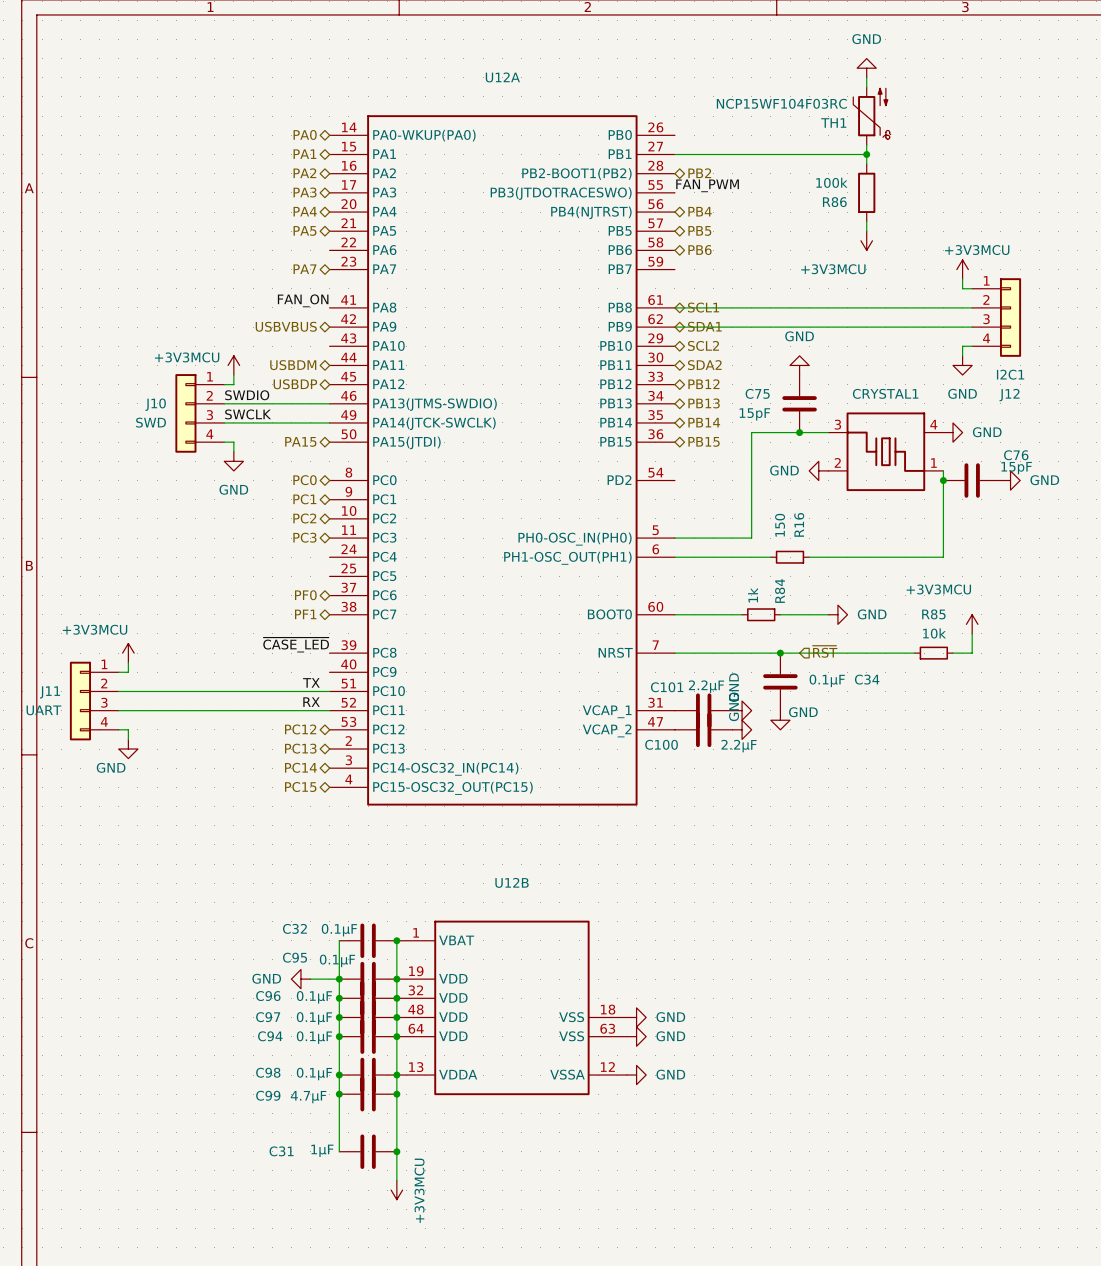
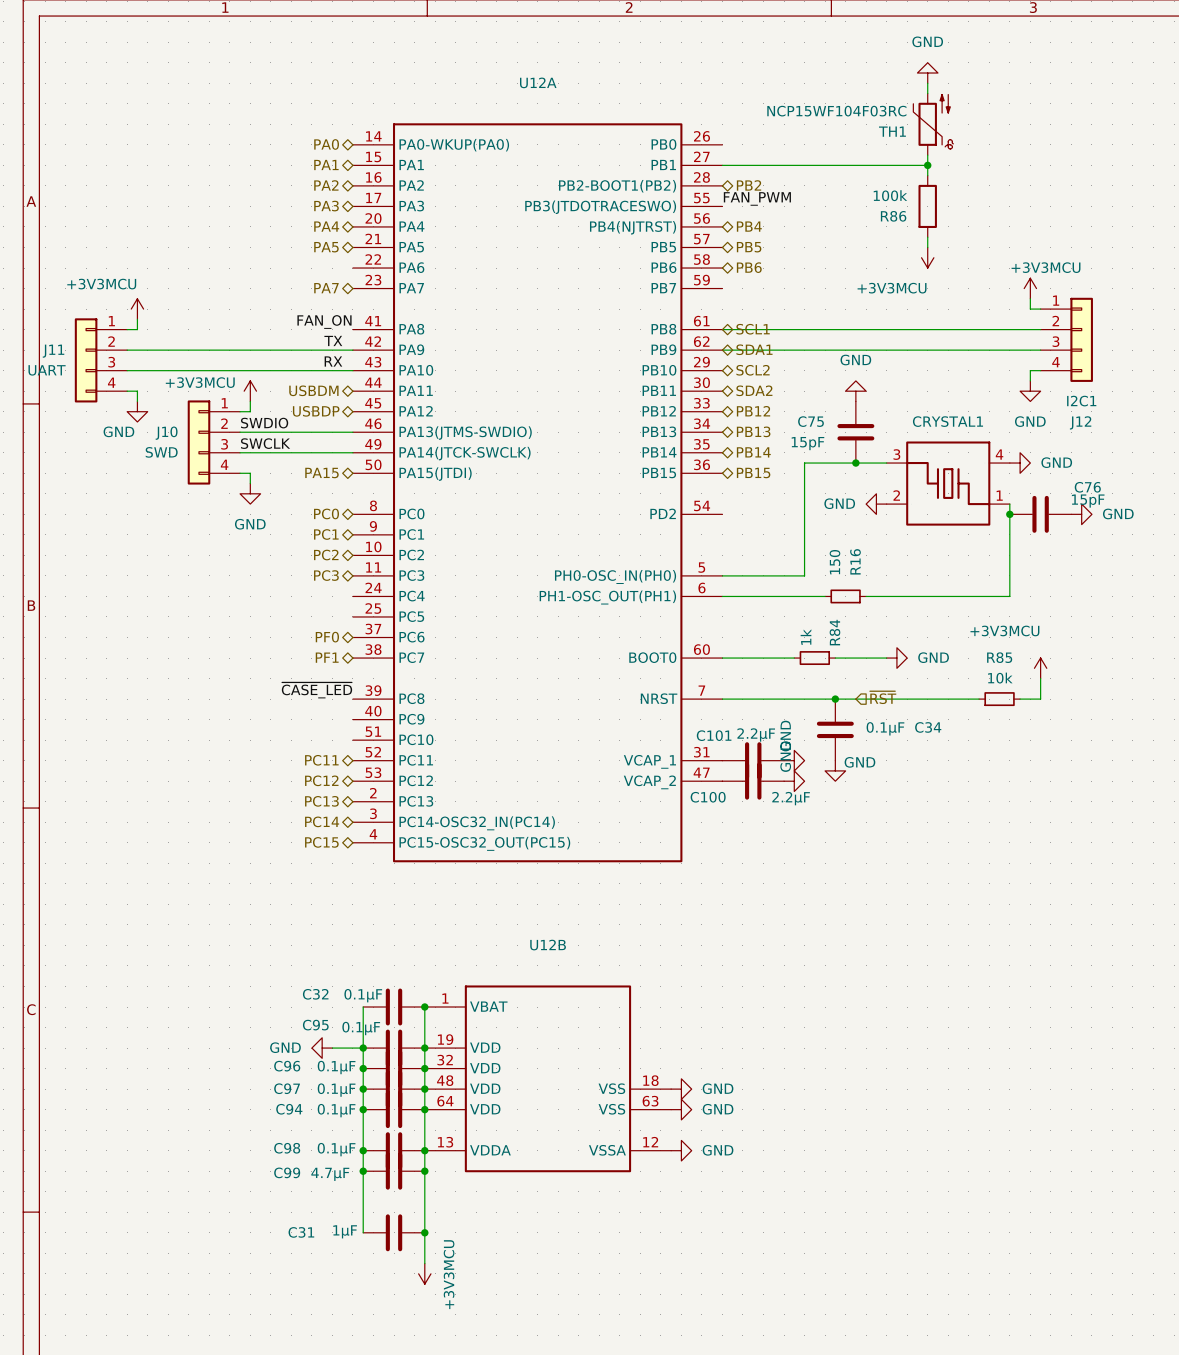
power symbol: none -> +3V3MCU (137, 309)
wire: none -> (137, 319) (137, 329) (127, 329)
label: none -> TX (333, 340)
hierarchical label: USBVBUS (286, 326) -> none
wire: none -> (127, 350) (352, 350)
label: none -> RX (333, 361)
wire: none -> (127, 370) (352, 370)
wire: none -> (127, 391) (137, 391) (137, 401)
power symbol: none -> GND (137, 411)
power symbol: +3V3MCU (128, 653) -> none
wire: (128, 662) (128, 672) (118, 672) -> none
label: TX (311, 682) -> none
wire: (118, 691) (329, 691) -> none
J11 position: (94, 701) -> (100, 360)
label: RX (311, 702) -> none
wire: (118, 710) (329, 710) -> none
hierarchical label: none -> PC11 (321, 760)
wire: (118, 729) (128, 729) (128, 739) -> none
power symbol: GND (128, 749) -> none

